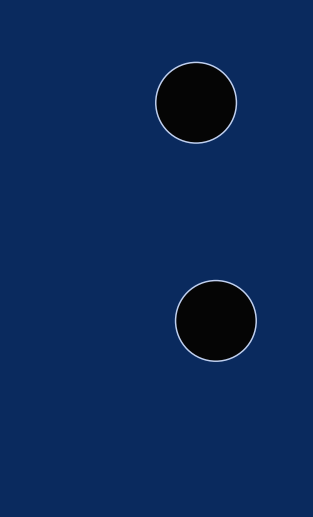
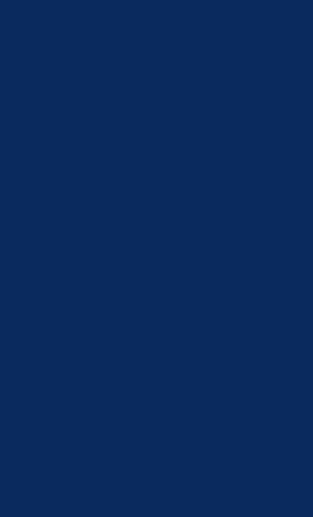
part: (196, 102) -> none
part: (215, 320) -> none

